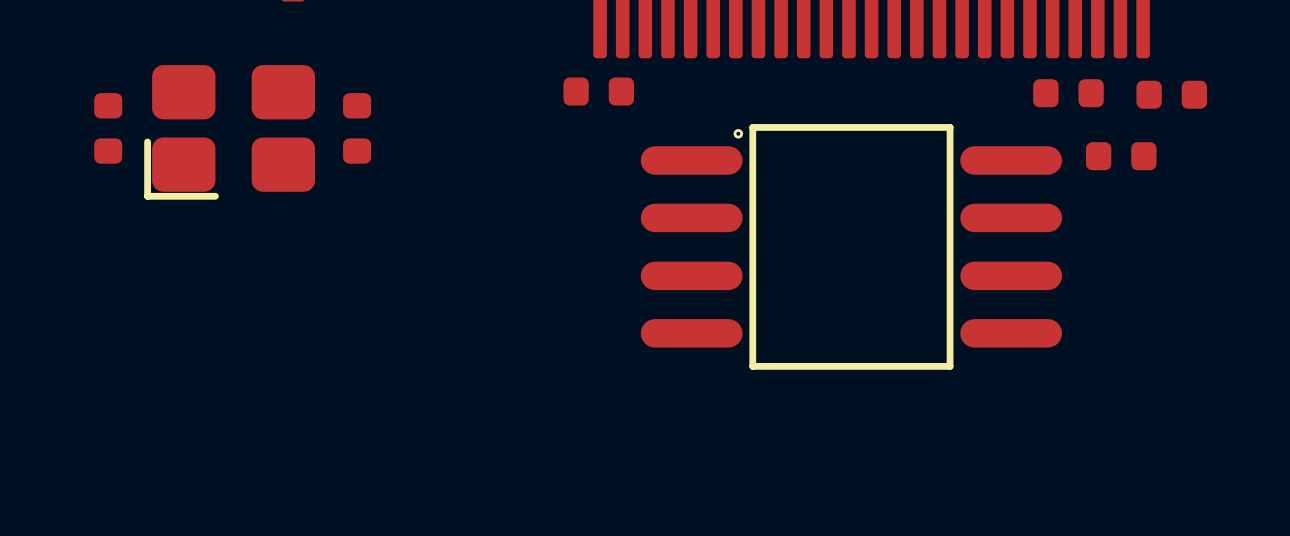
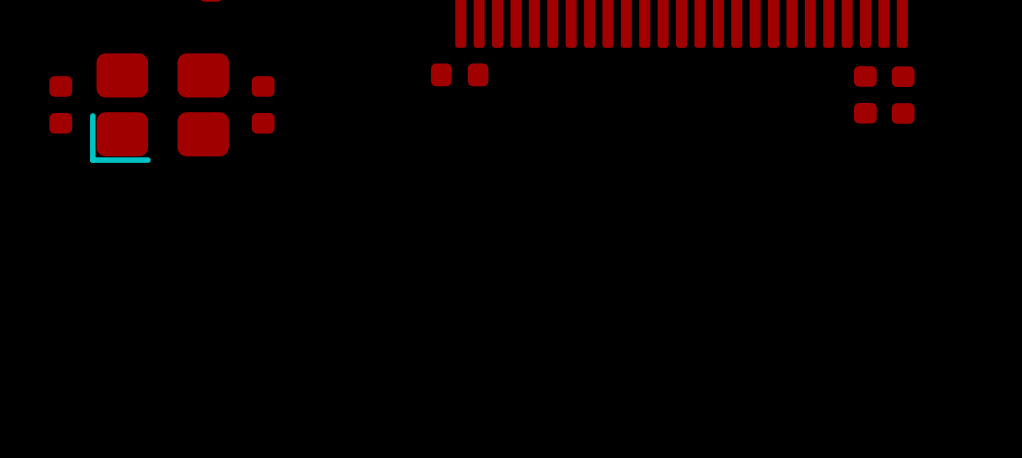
part: (1068, 93) -> none
part: (1171, 94) -> none
part: none -> (865, 94)
part: none -> (903, 95)
part: (1121, 156) -> none
part: (851, 246) -> none

